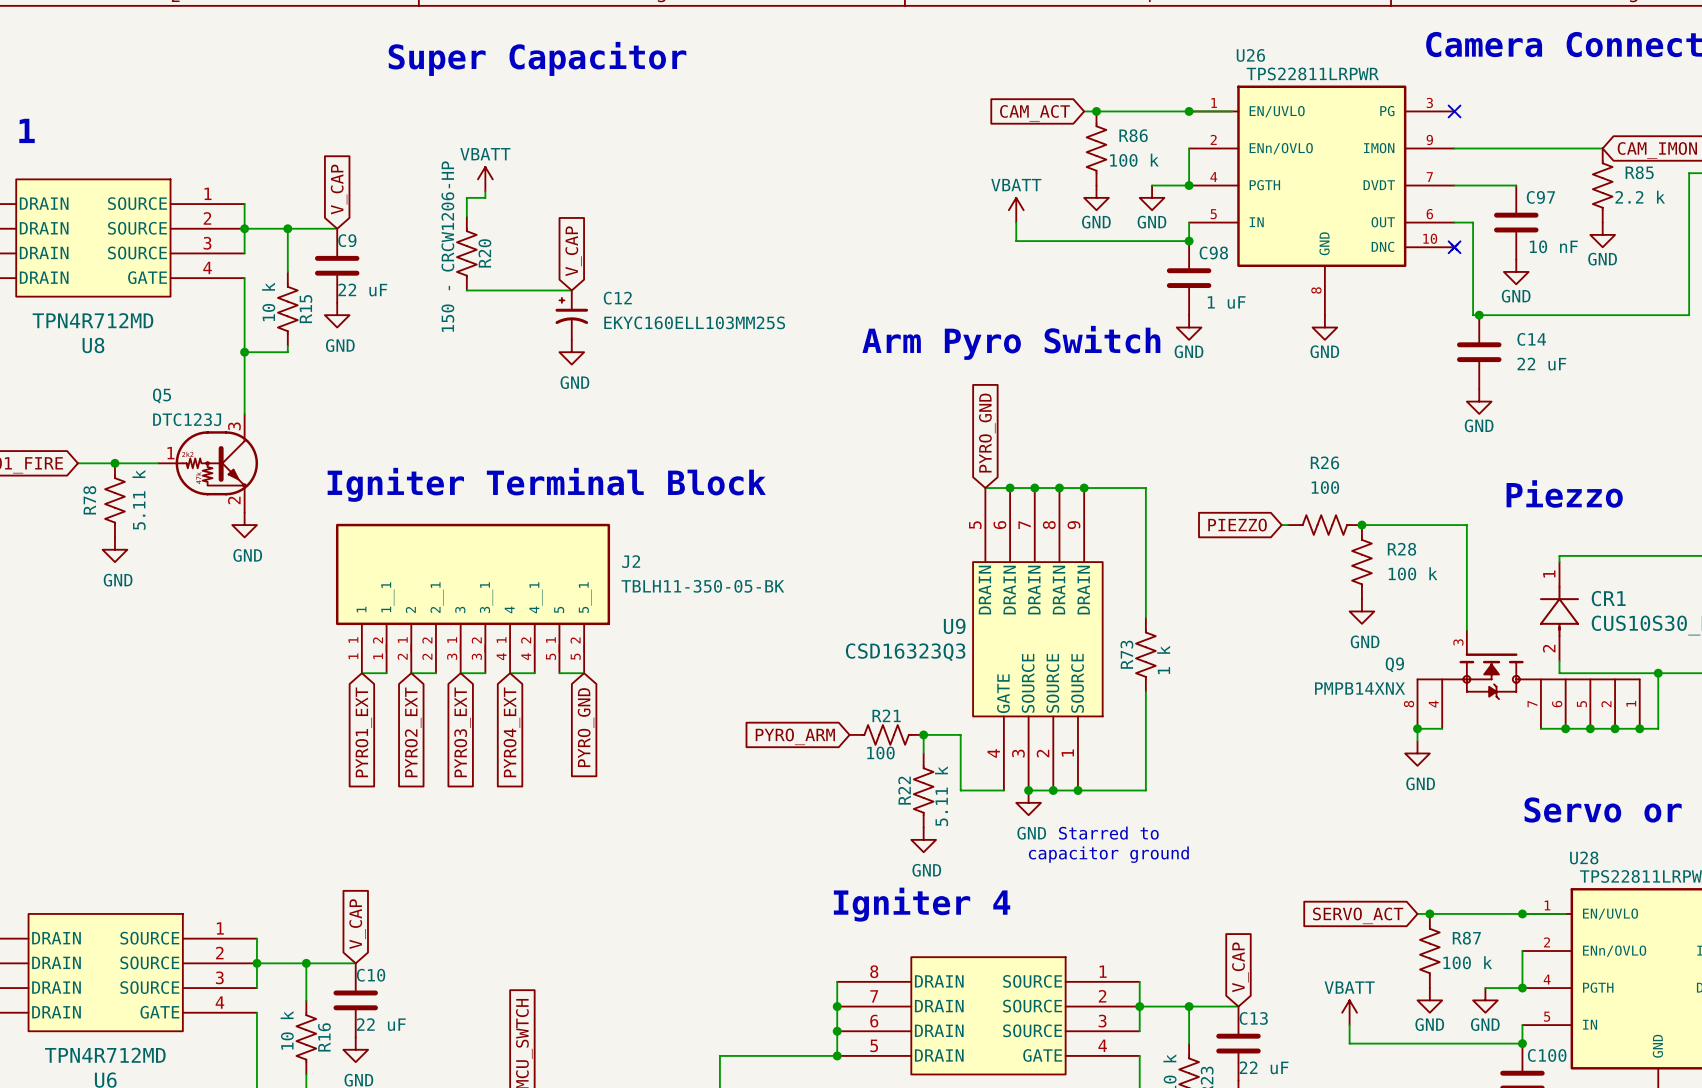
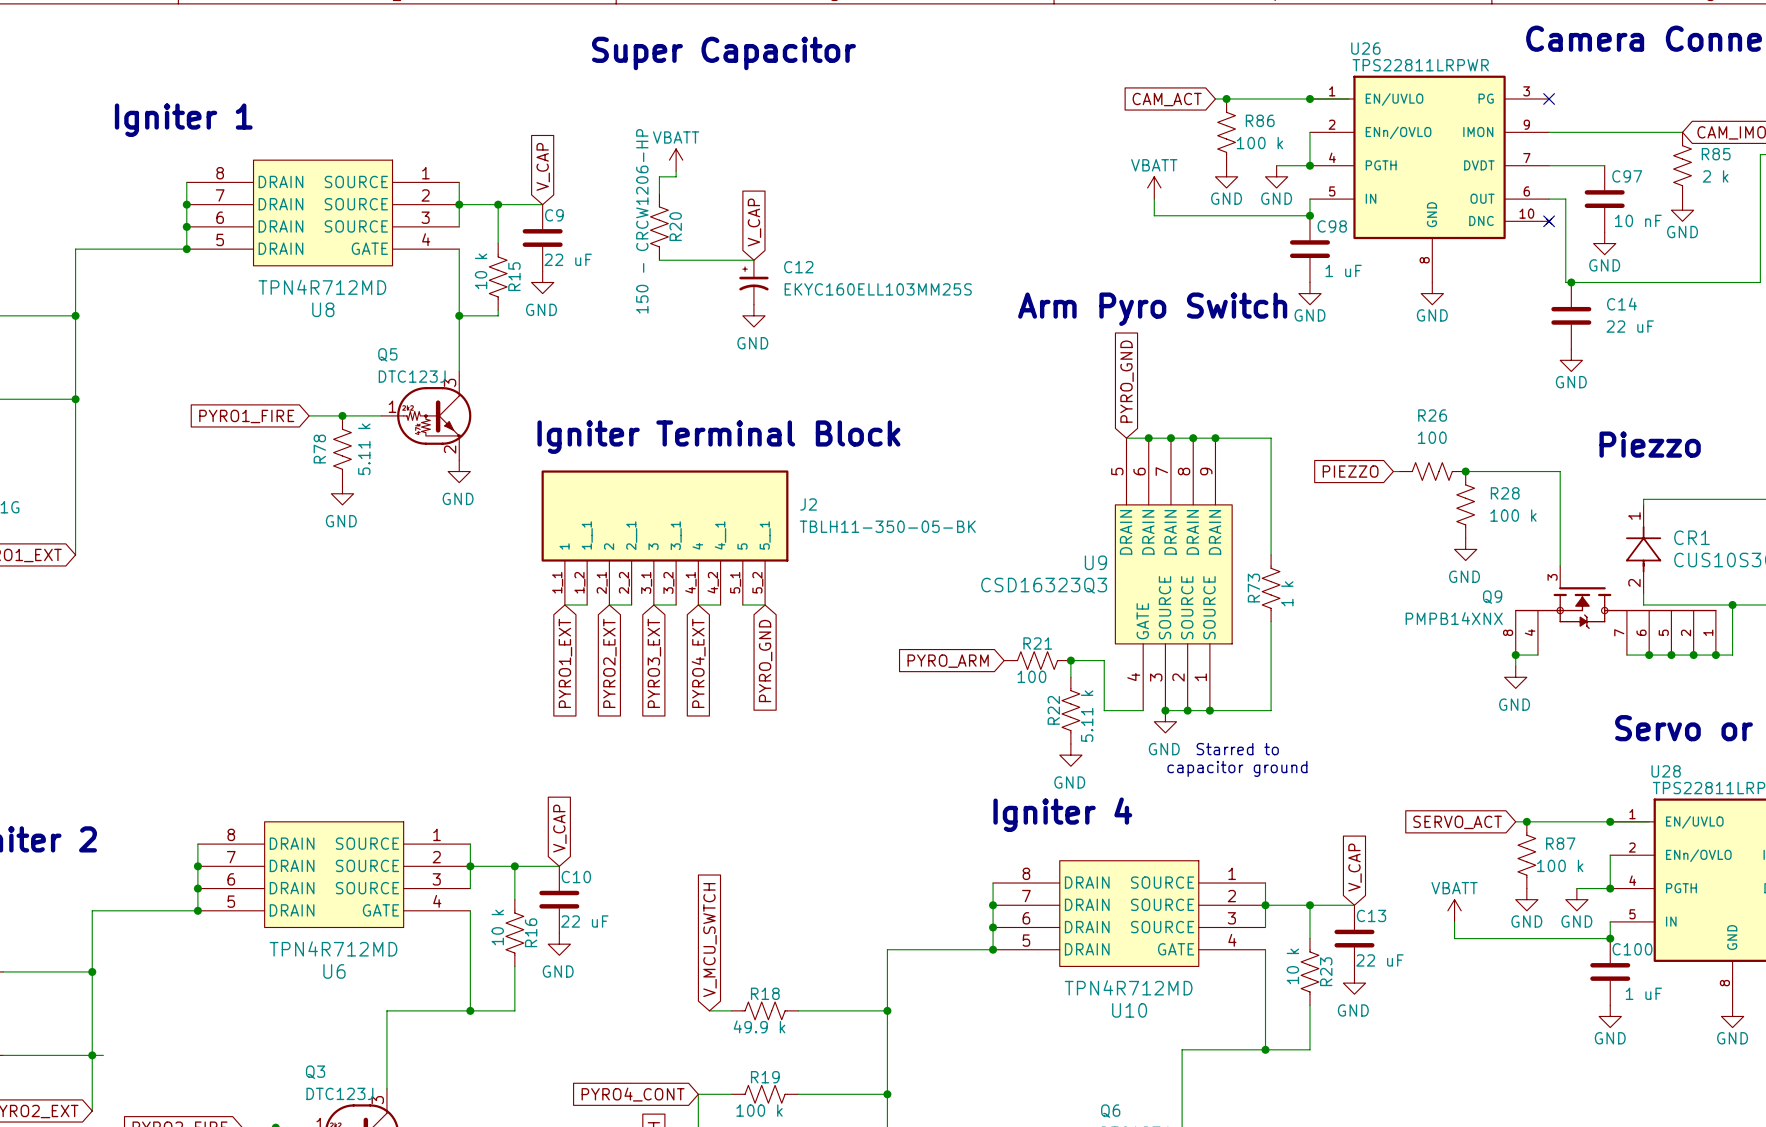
R85 value: 2.2 k (1640, 197) -> 2 k (1715, 176)

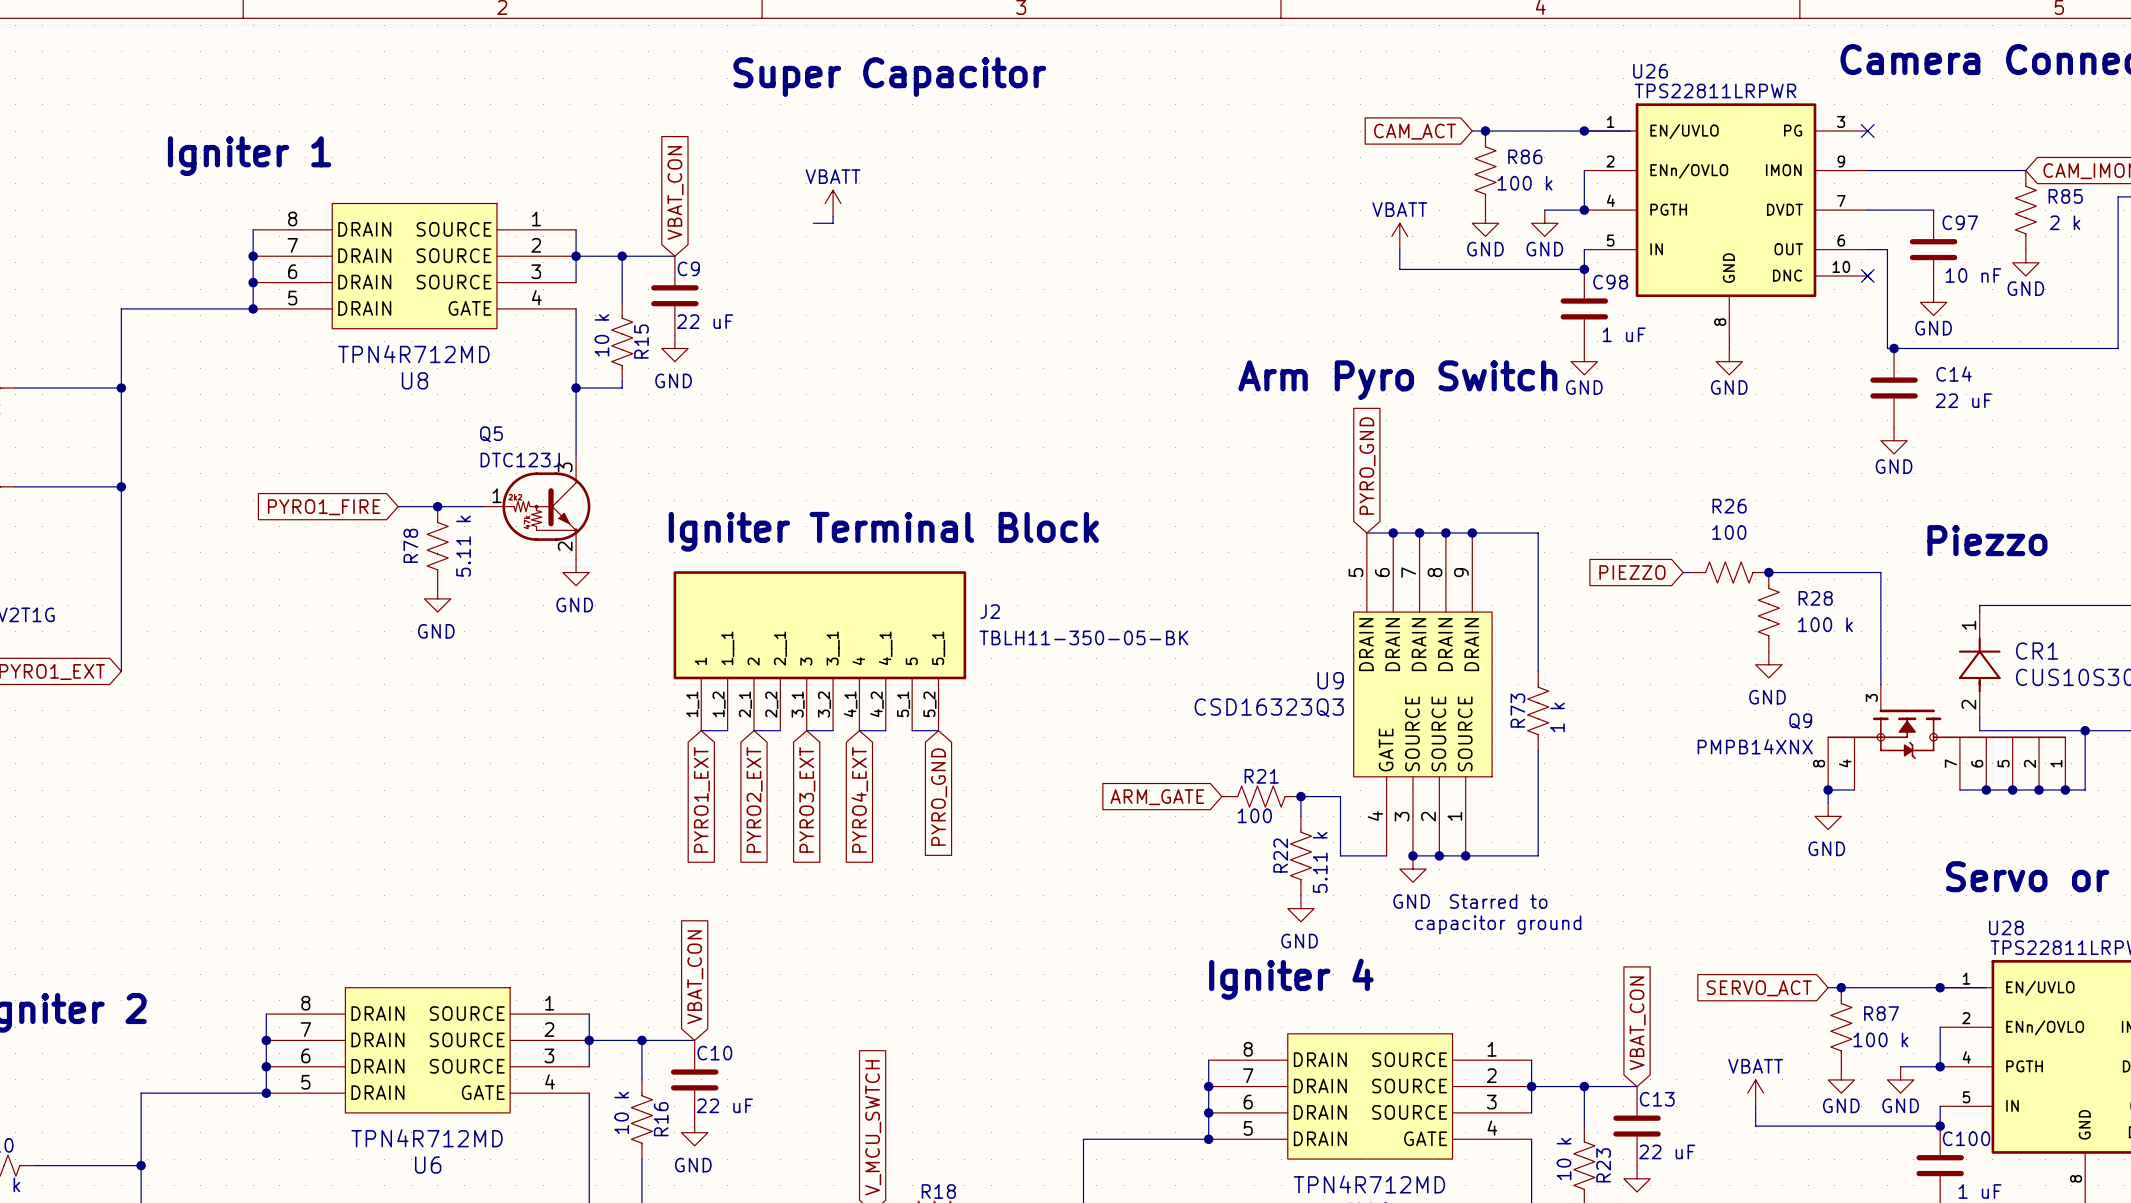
global label: V_CAP (543, 166) -> VBAT_CON (675, 192)
wire: (659, 176) (659, 193) -> none
global label: V_CAP (754, 222) -> none
R20: 150 - CRCW1206-HP (659, 226) -> none
wire: (659, 260) (753, 260) -> none
C12: EKYC160ELL103MM25S (753, 282) -> none
power symbol: GND (753, 315) -> none
global label: PYRO_ARM (948, 661) -> ARM_GATE (1157, 797)
global label: V_CAP (559, 828) -> VBAT_CON (695, 977)
global label: V_CAP (1355, 867) -> VBAT_CON (1637, 1023)

